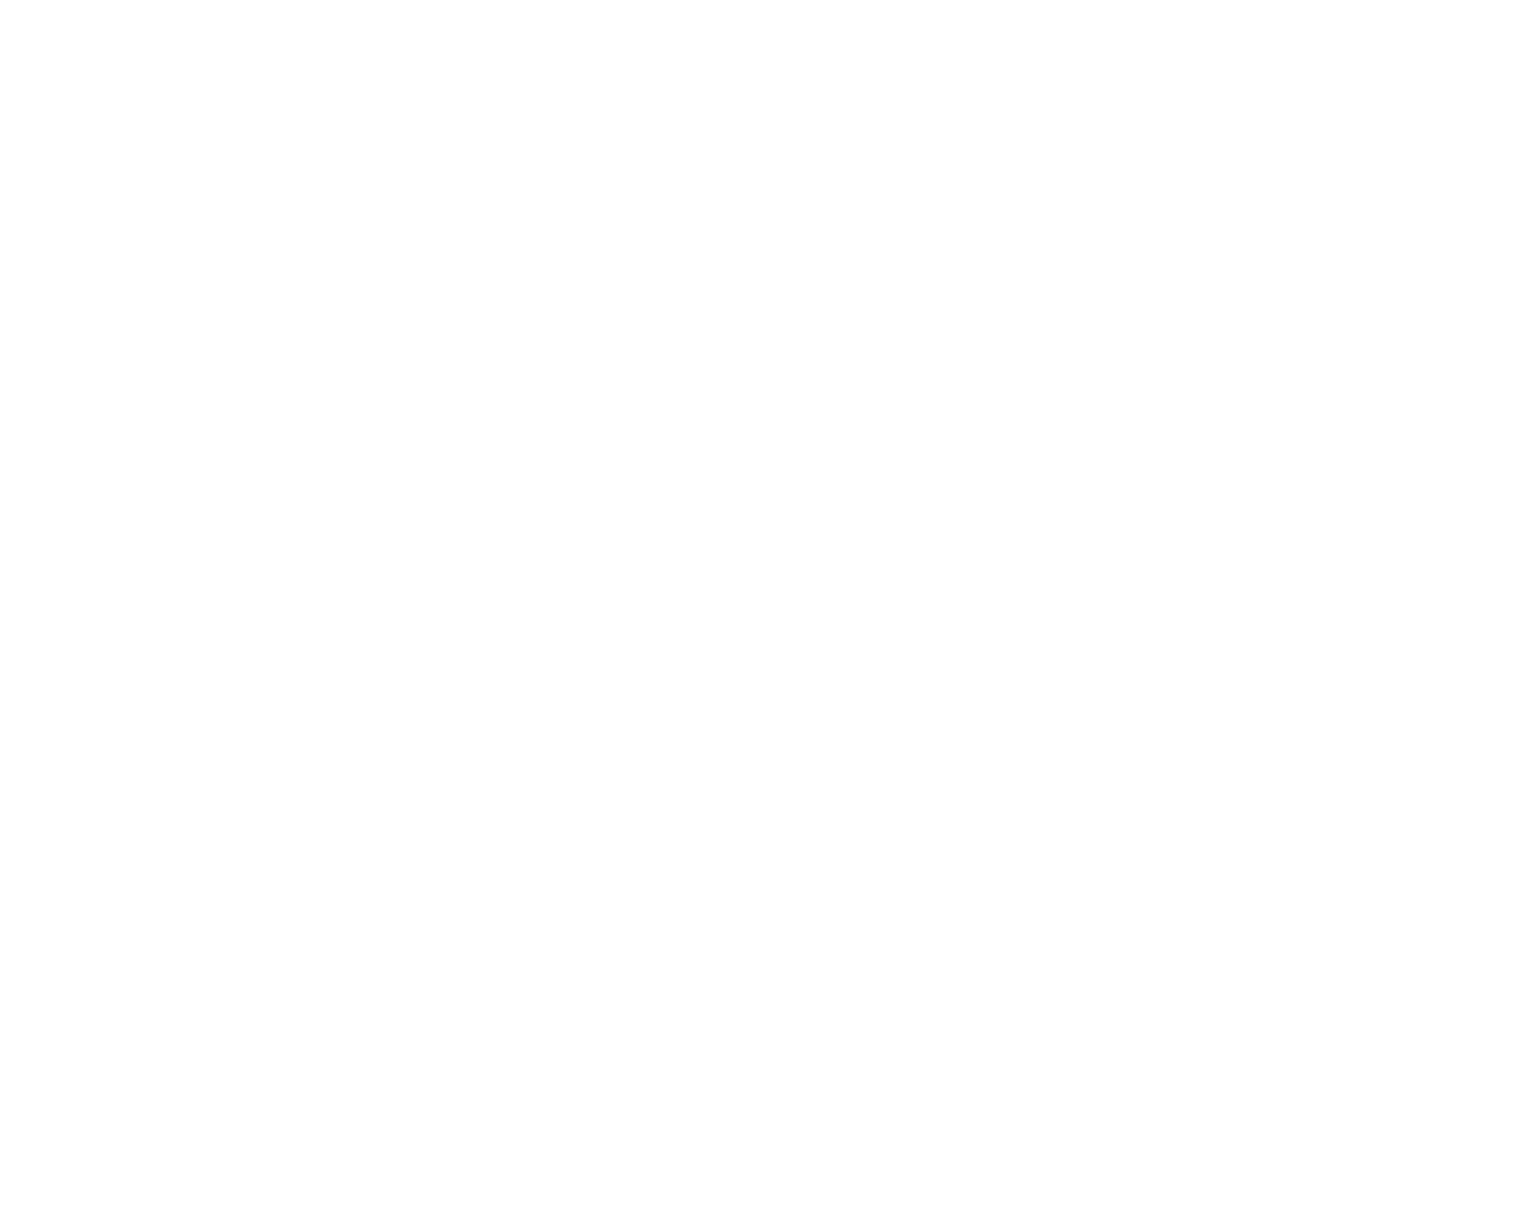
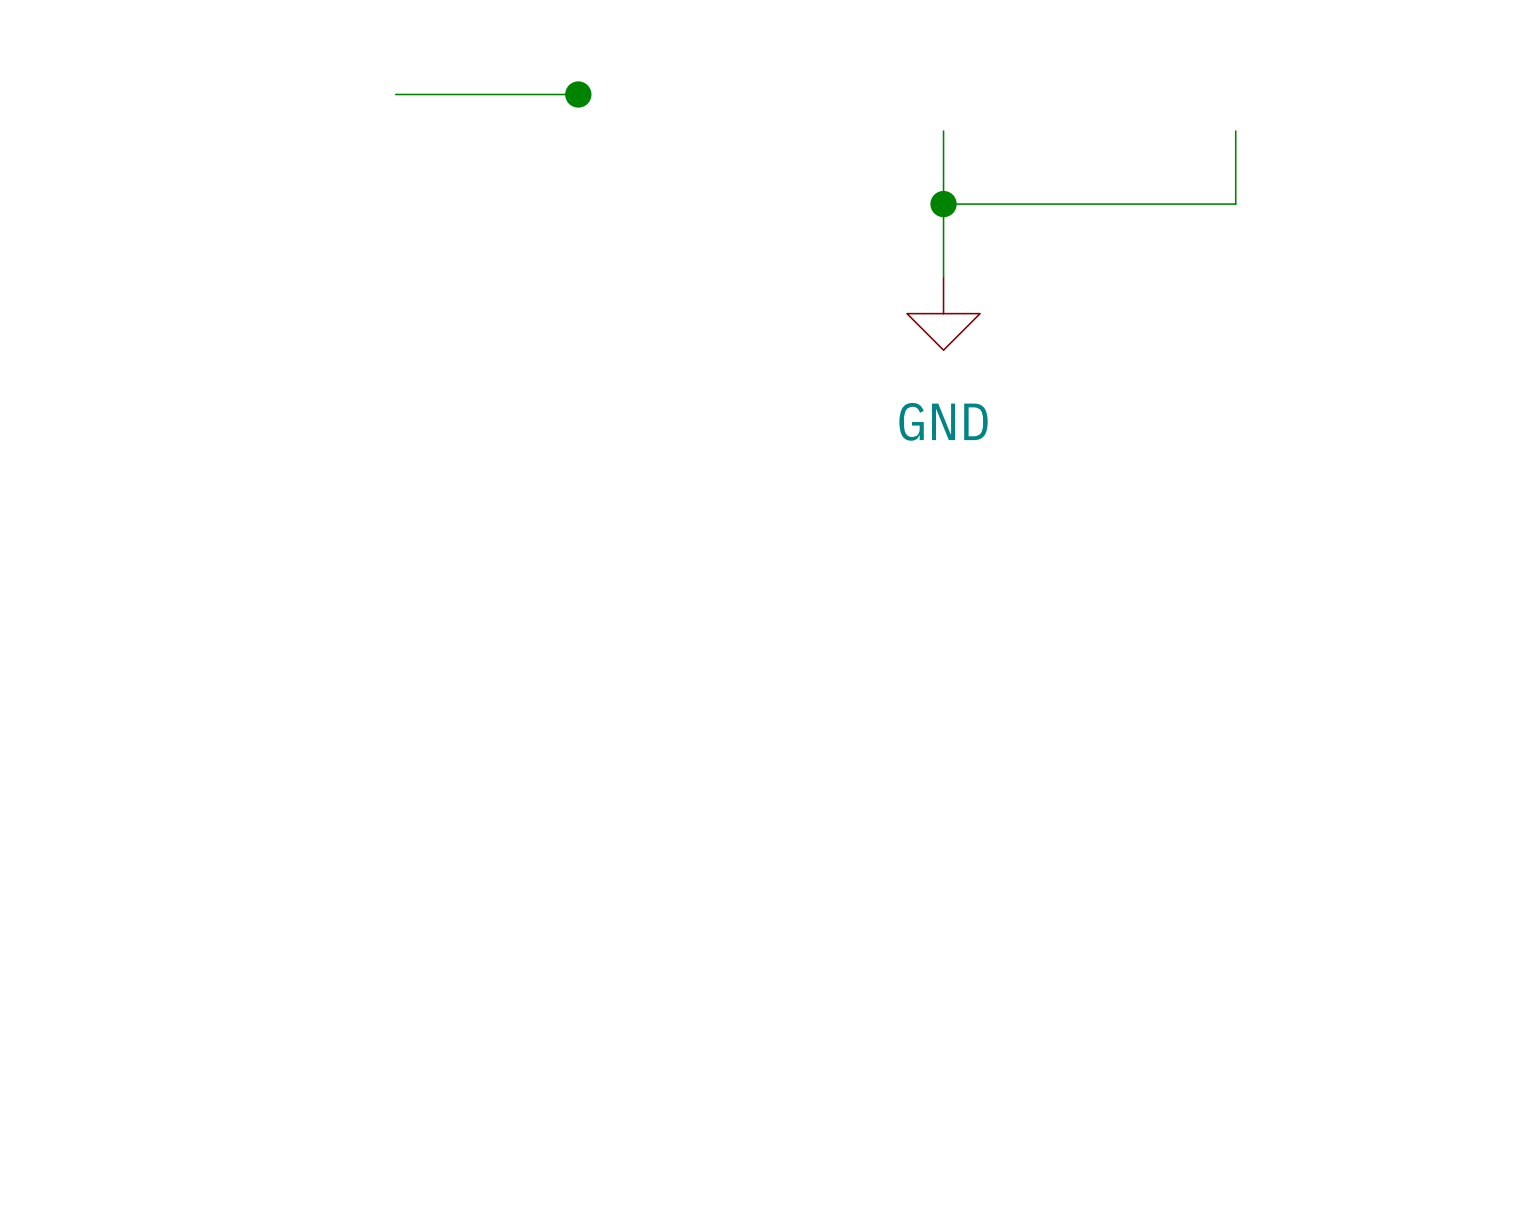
wire: none -> (395, 94) (578, 94)
junction: none -> (578, 94)
wire: none -> (943, 131) (943, 277)
wire: none -> (1235, 131) (1235, 204) (943, 204)
junction: none -> (943, 204)
power symbol: none -> GND (943, 313)

